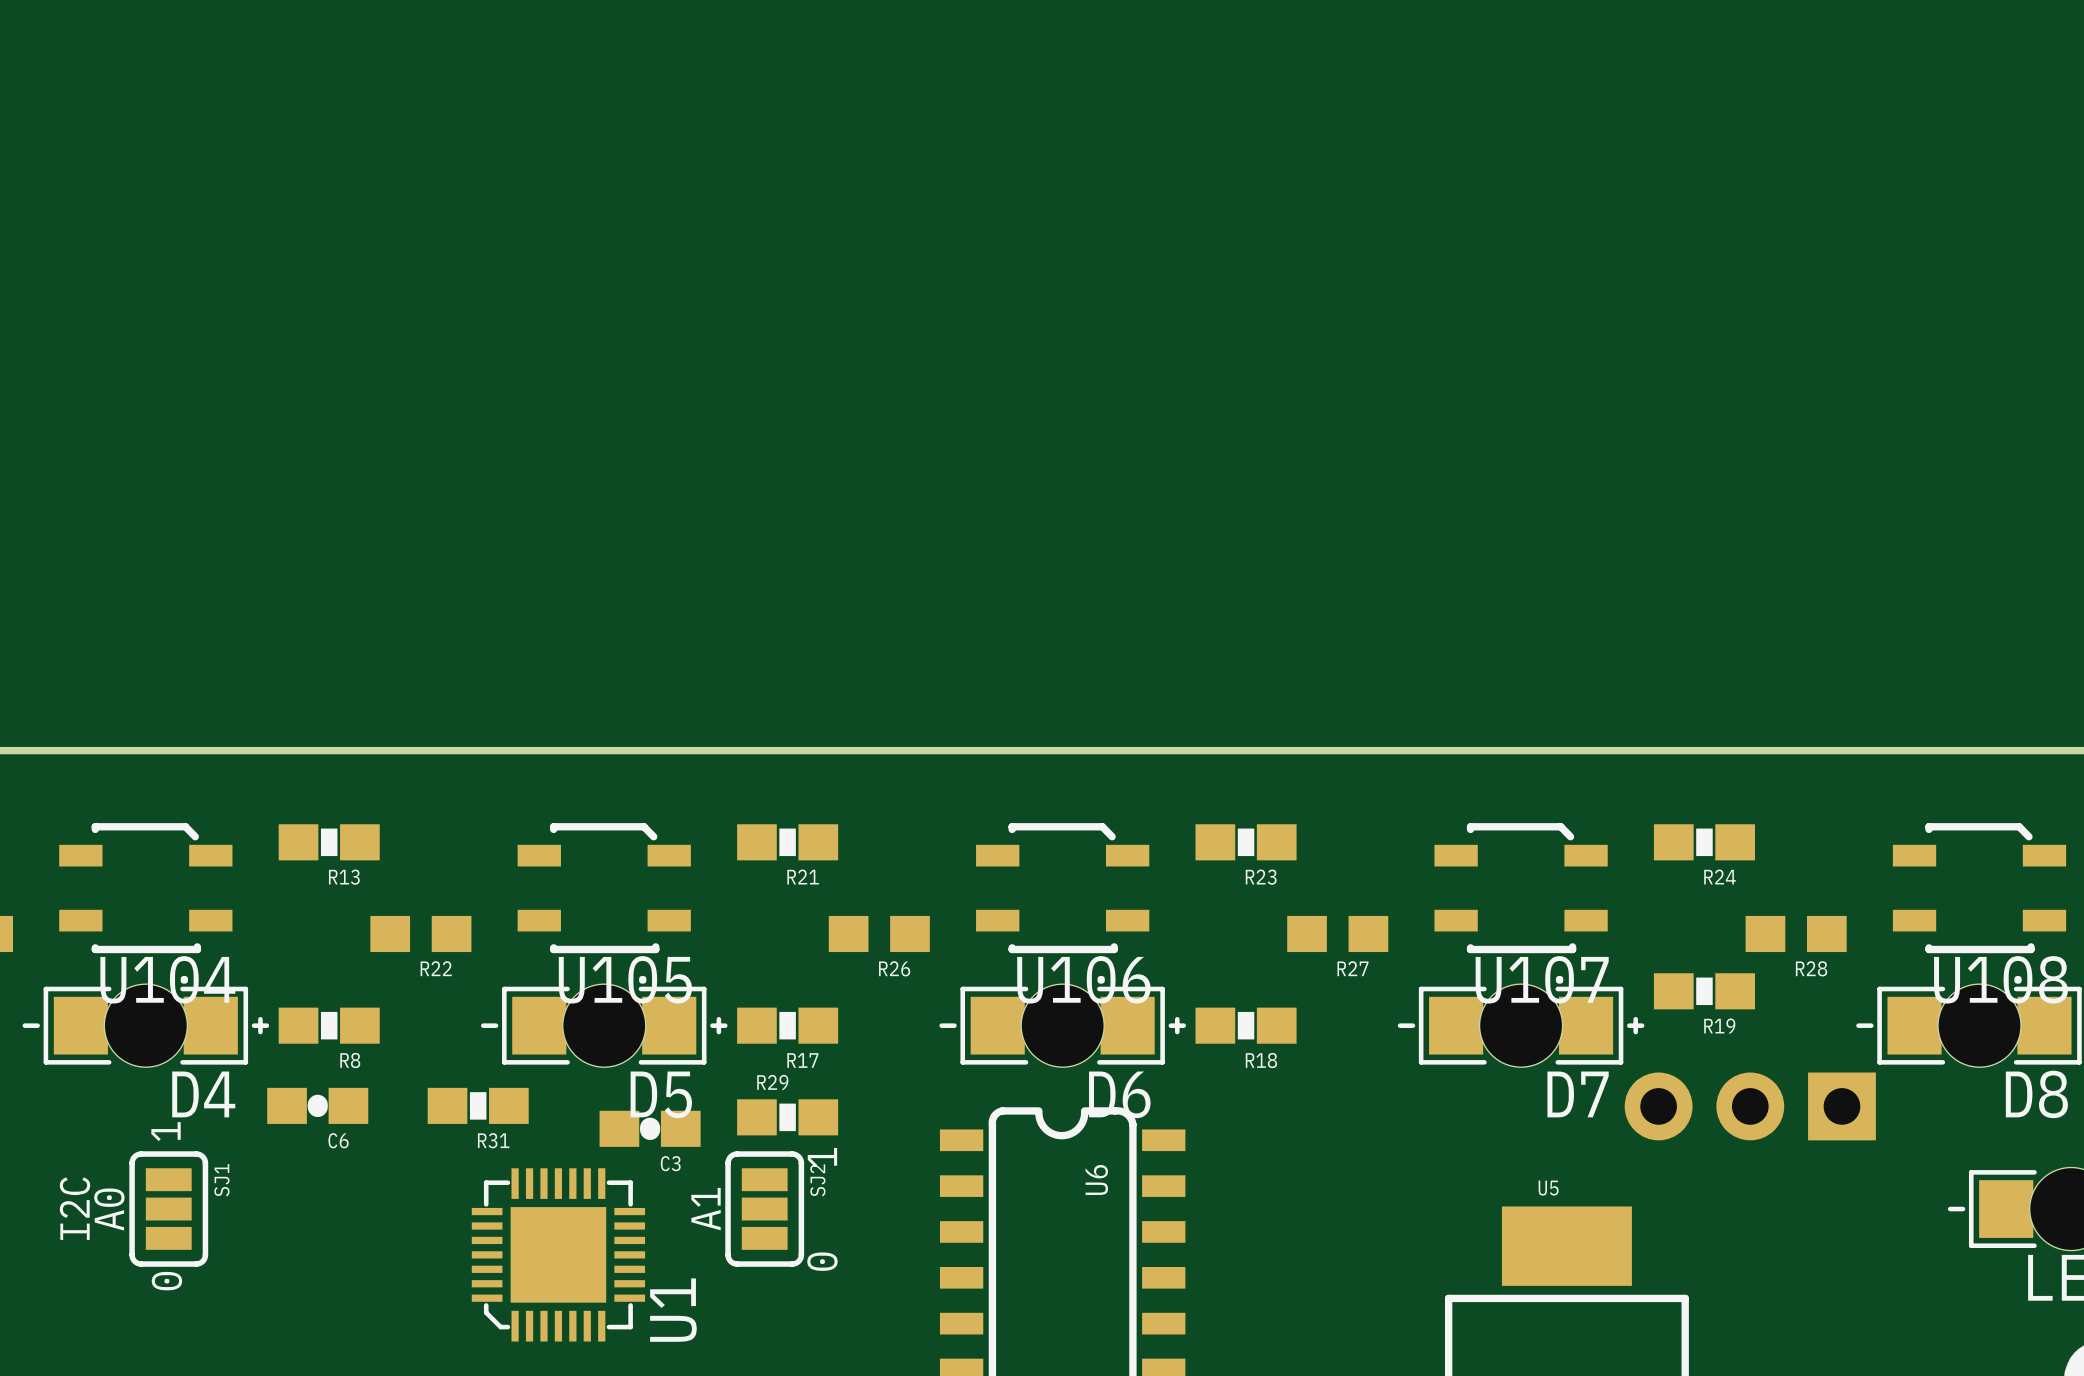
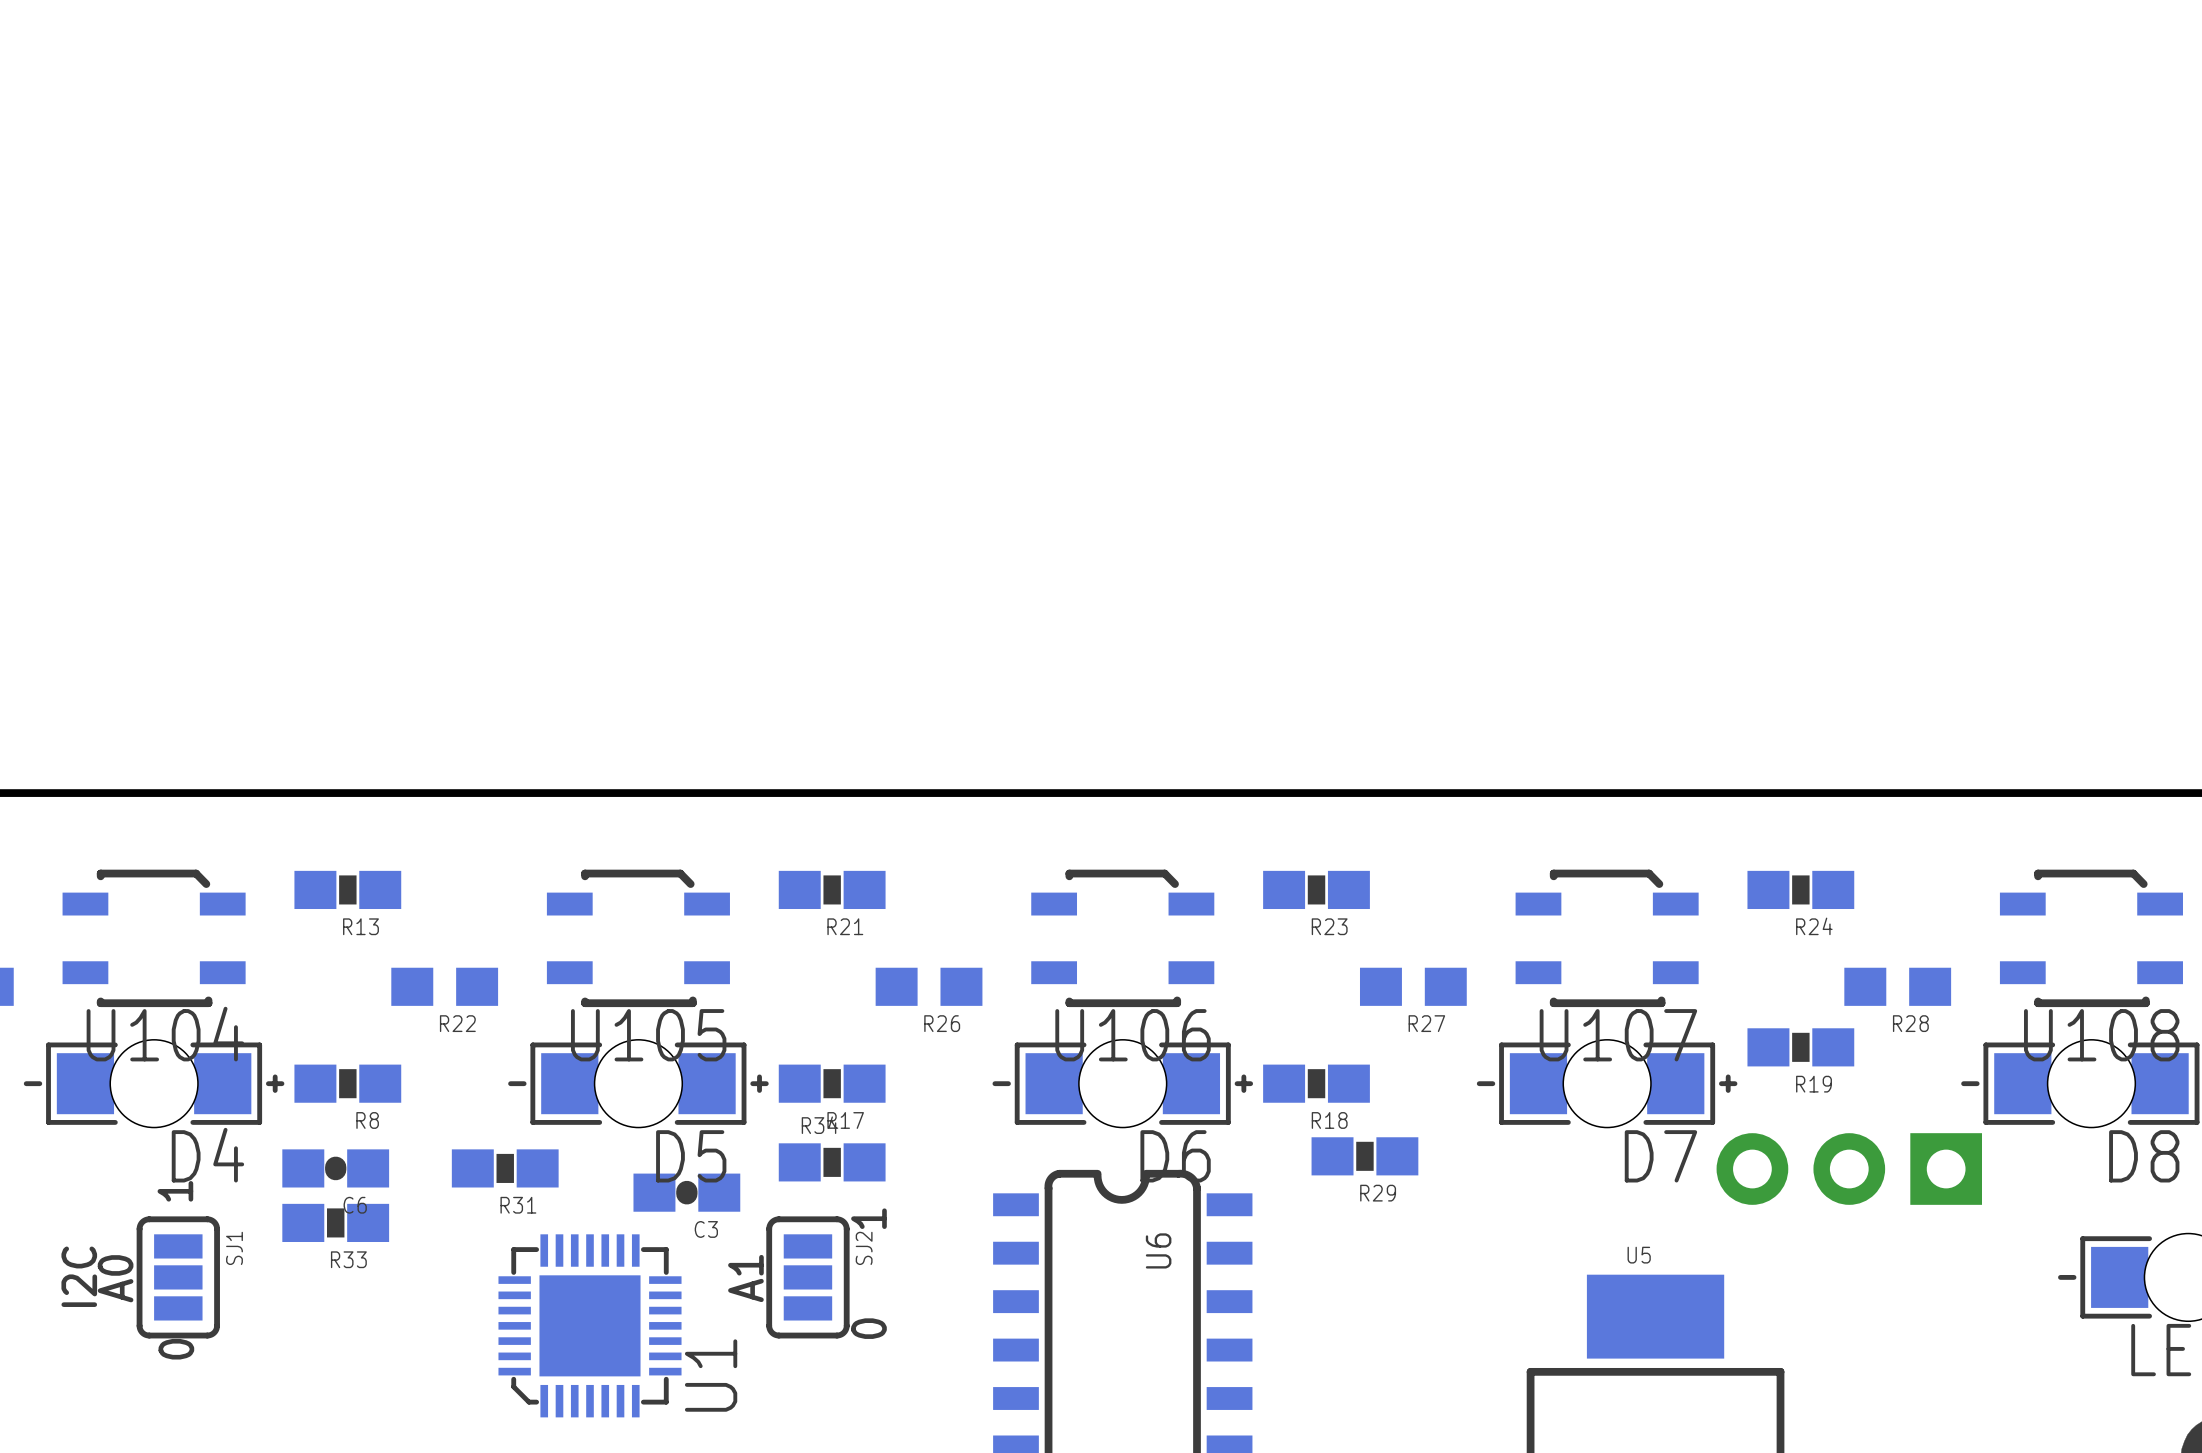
R29 name position: R29 (772, 1082) -> R29 (1378, 1193)
R34: none -> (832, 1162)
R29 position: (787, 1117) -> (1364, 1156)
R33: none -> (335, 1222)

